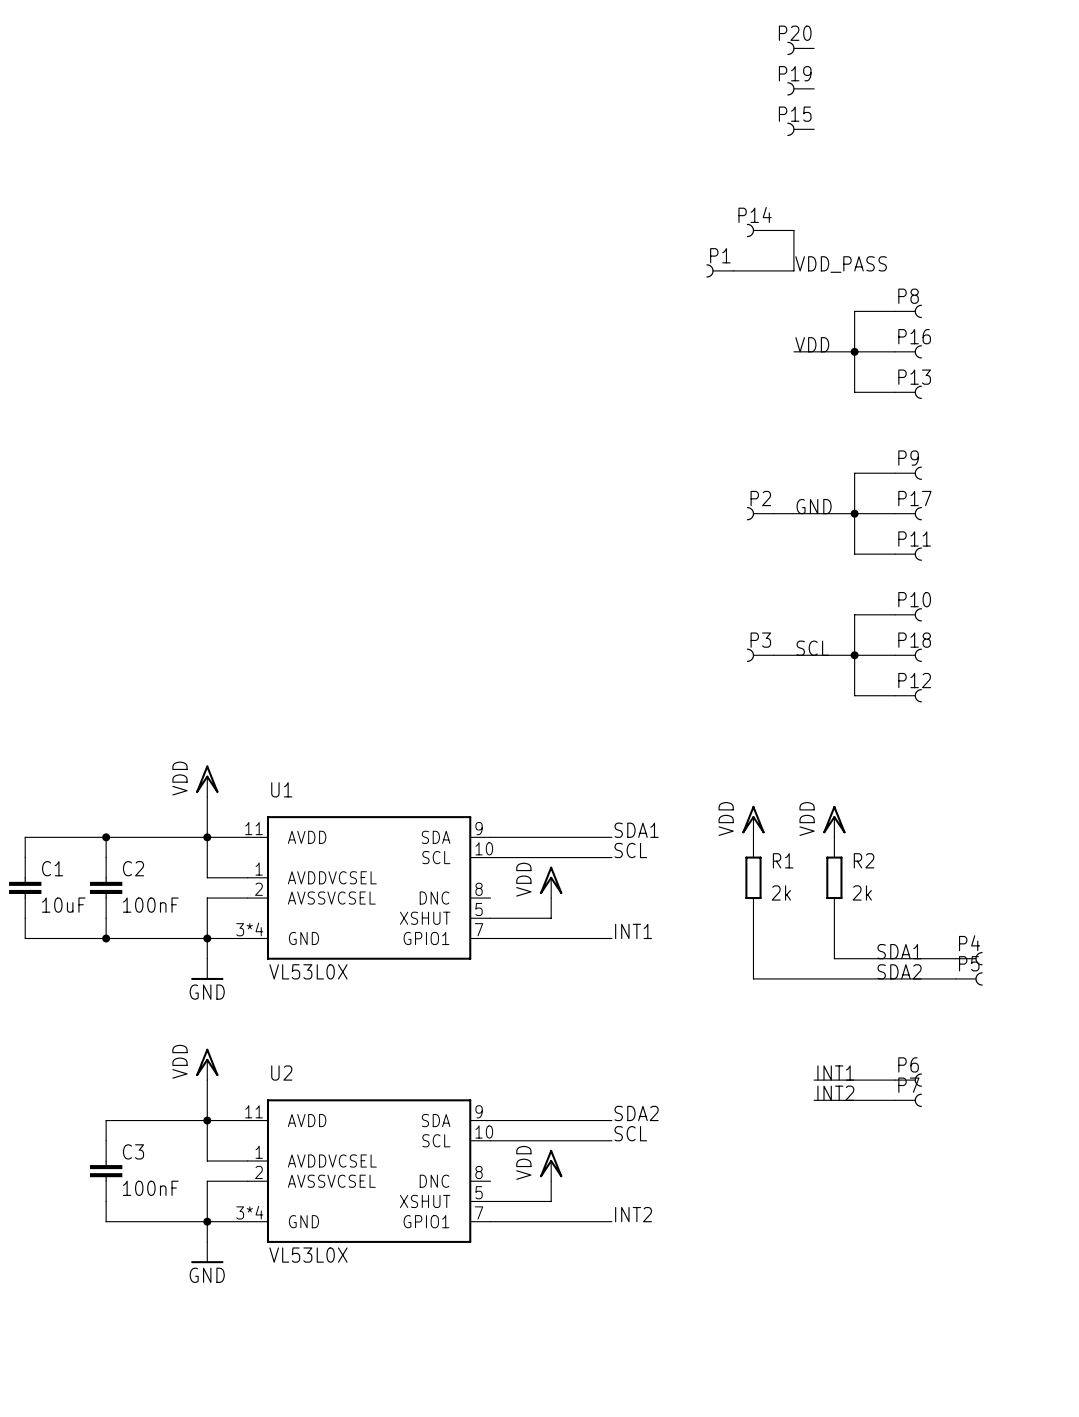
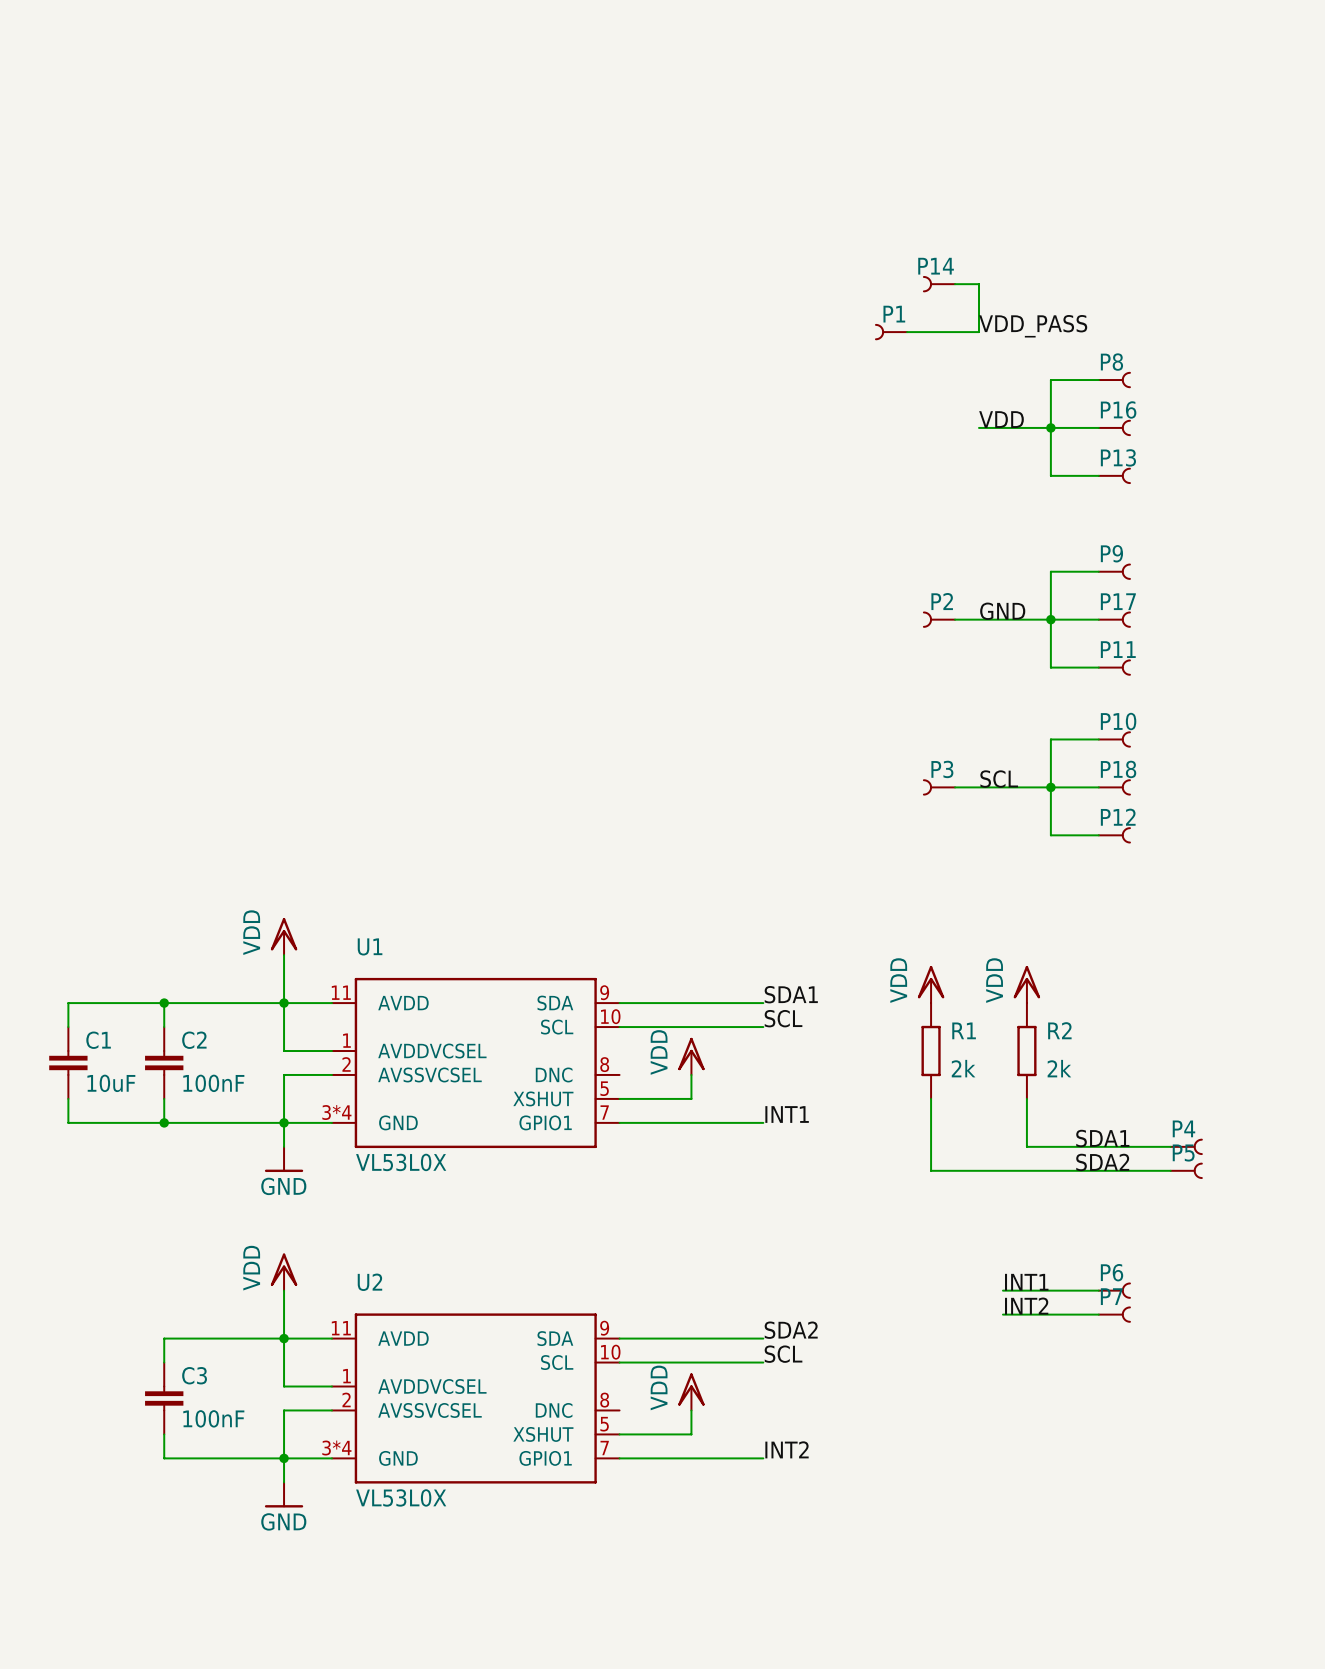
P20: (800, 48) -> none
P19: (800, 88) -> none
P15: (800, 129) -> none

